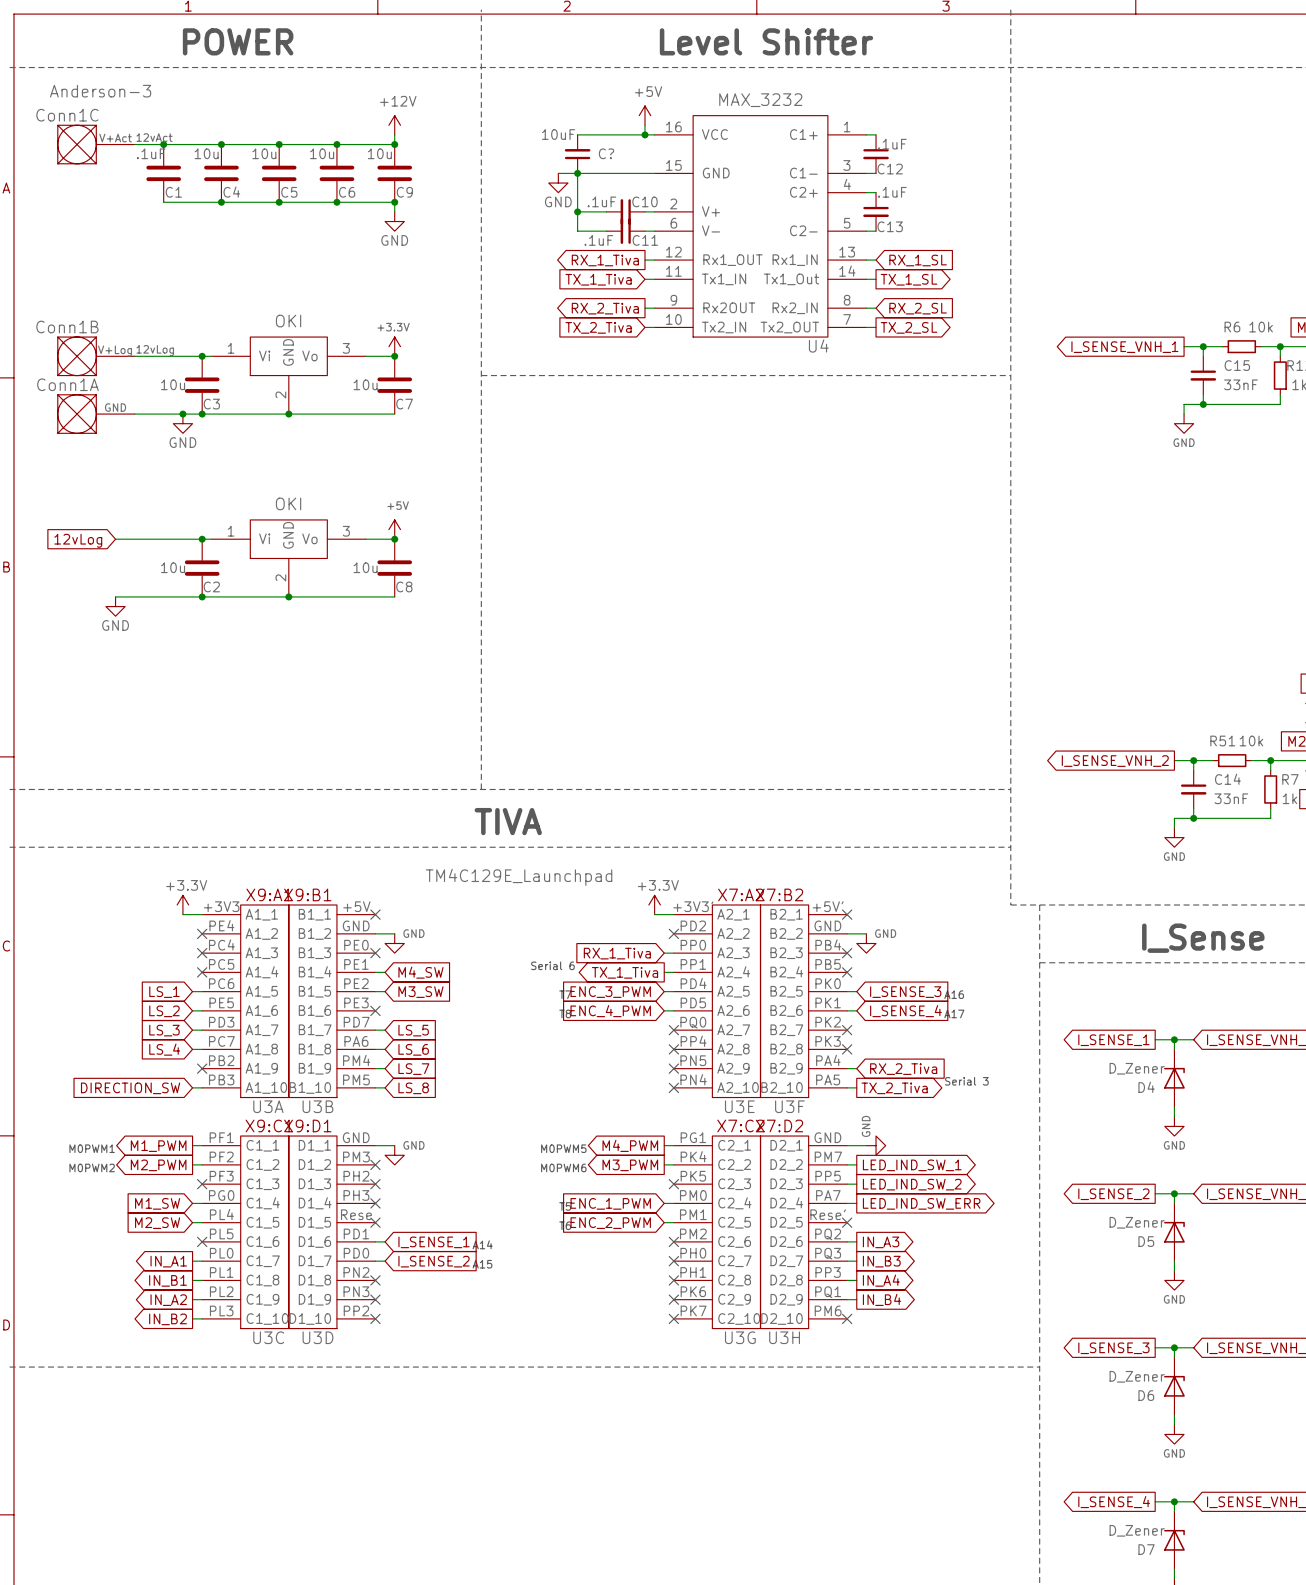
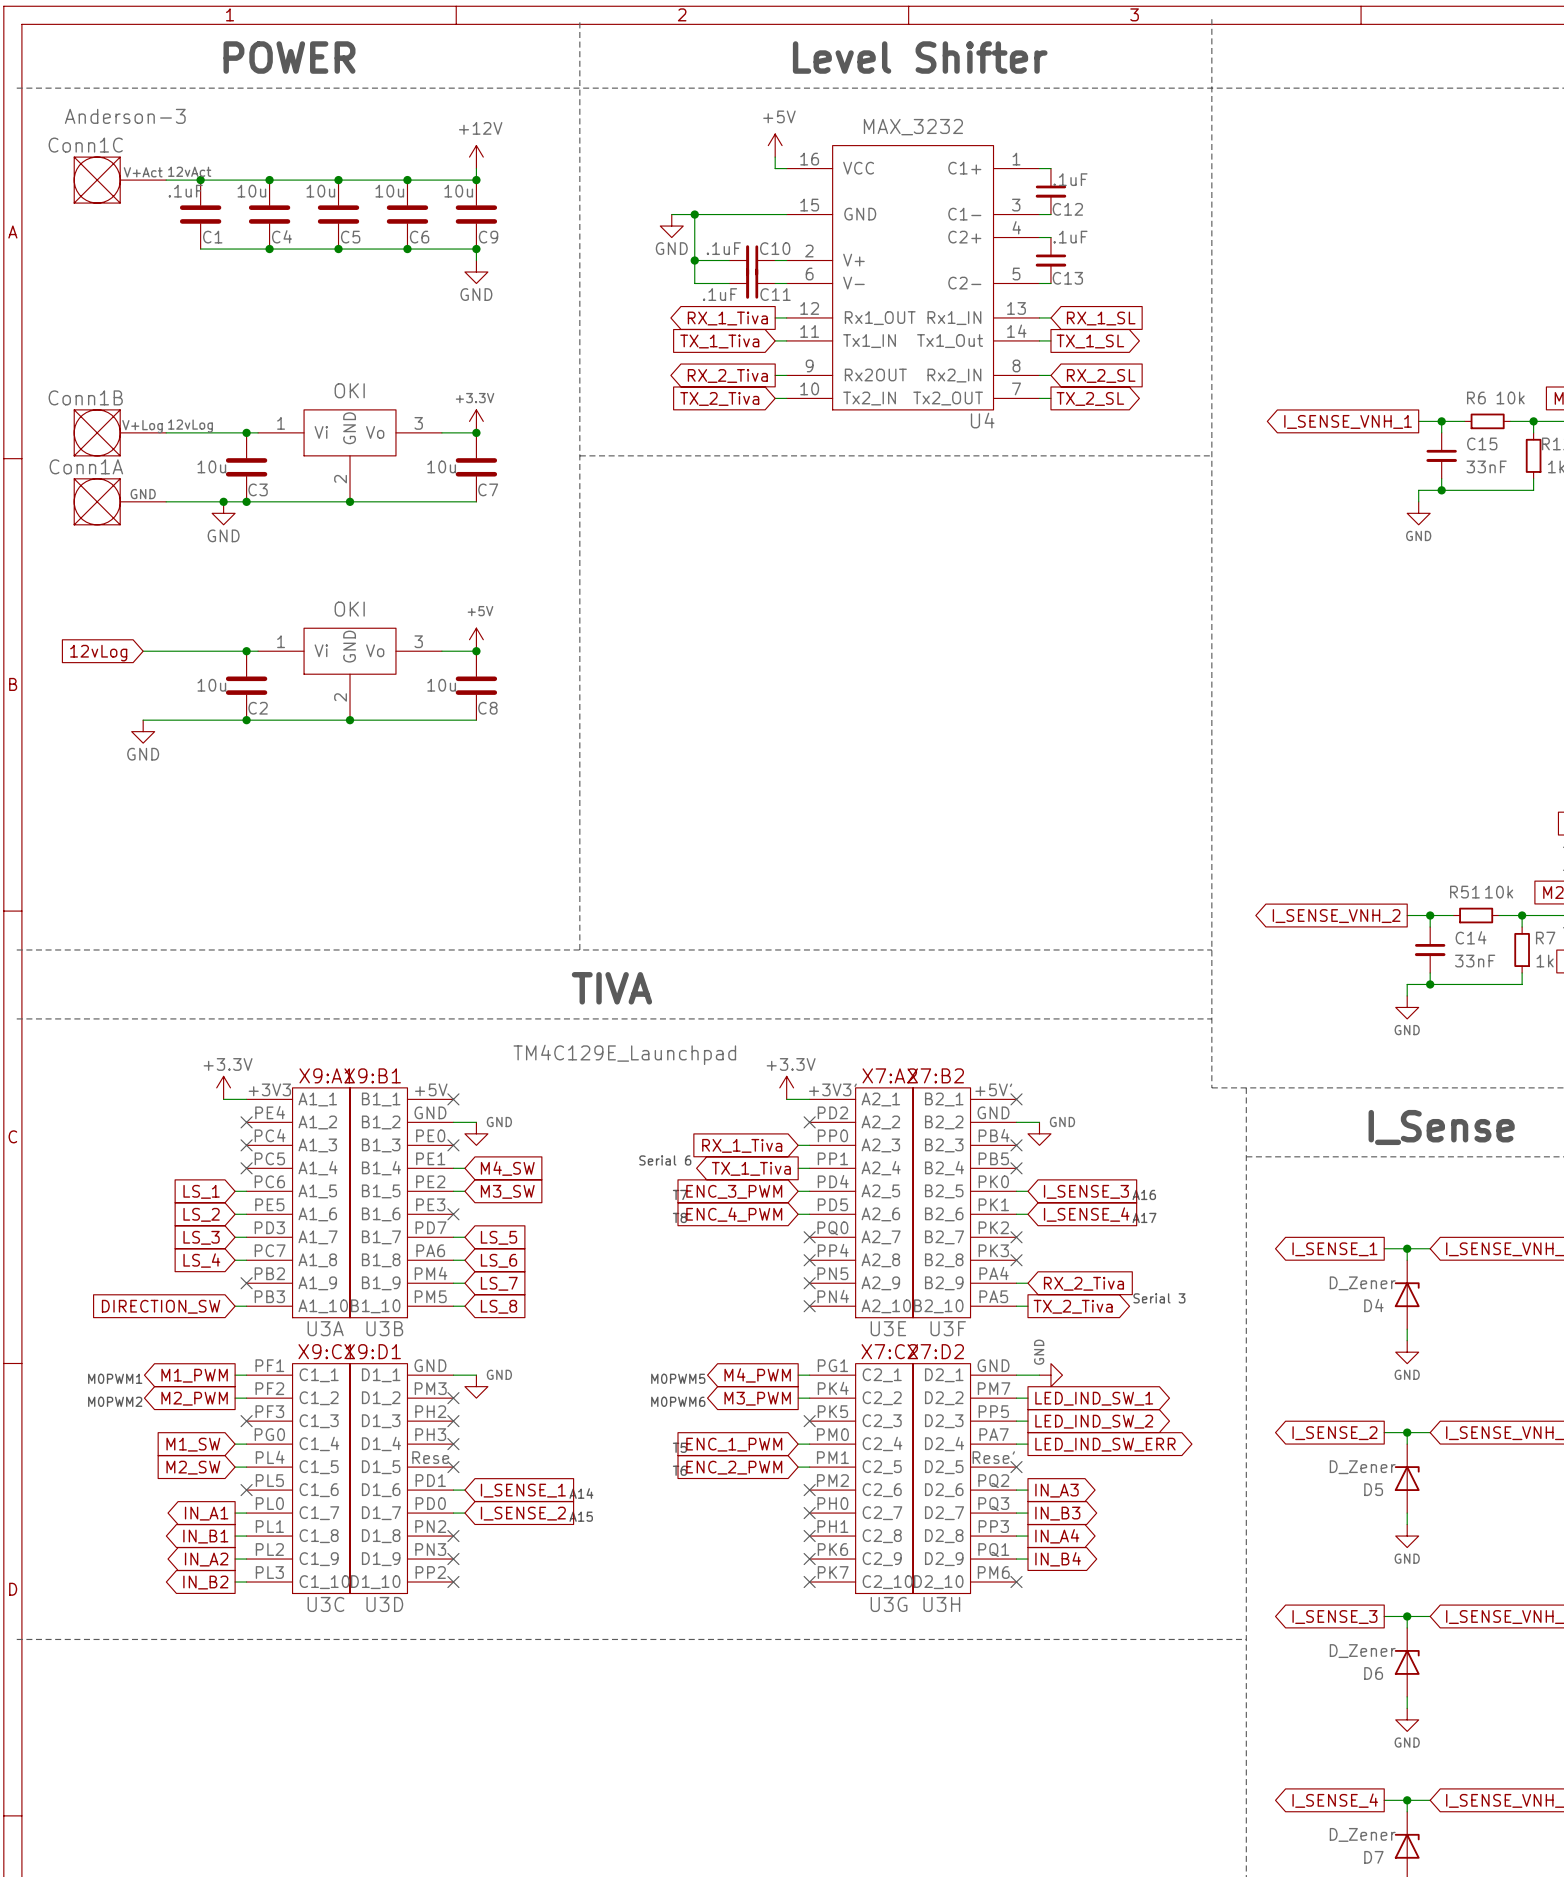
wire: (577, 134) (644, 134) -> none
junction: (644, 134) -> none
C?: 10uF (577, 154) -> none

